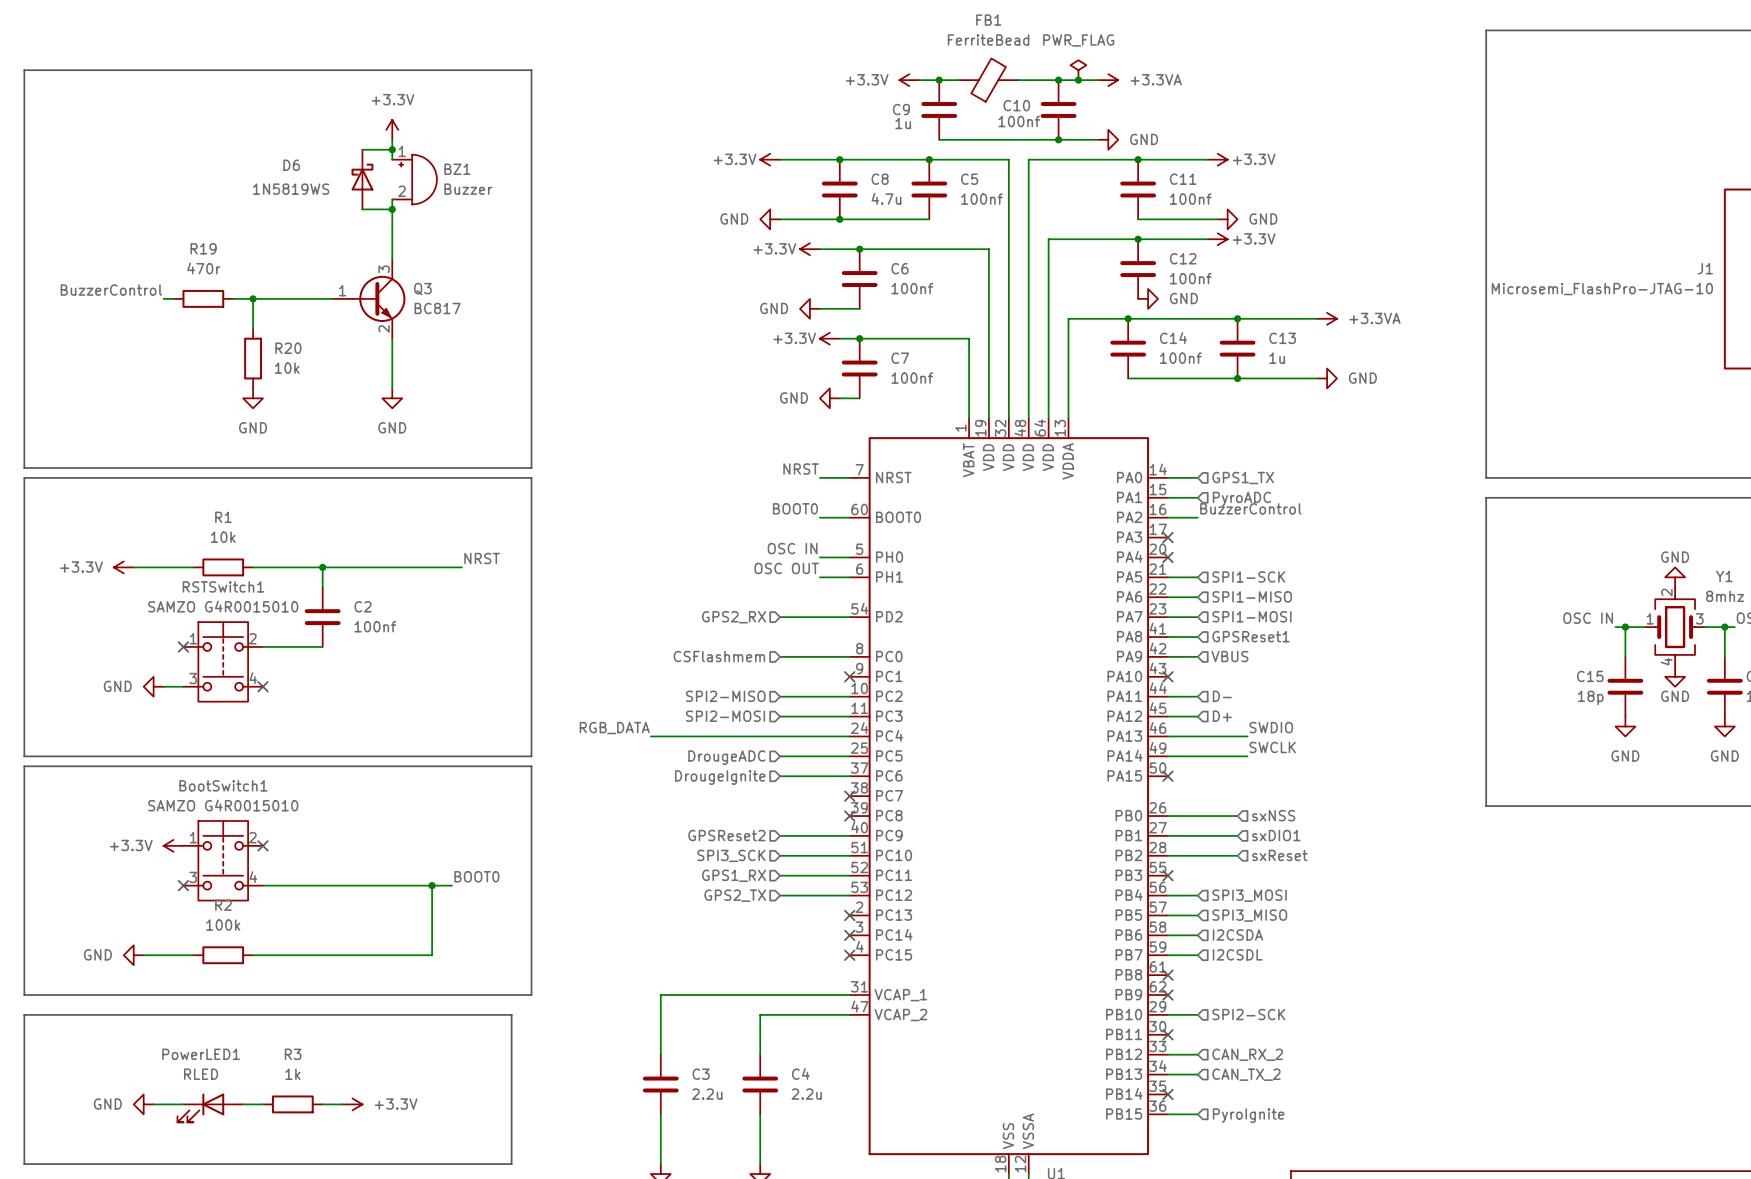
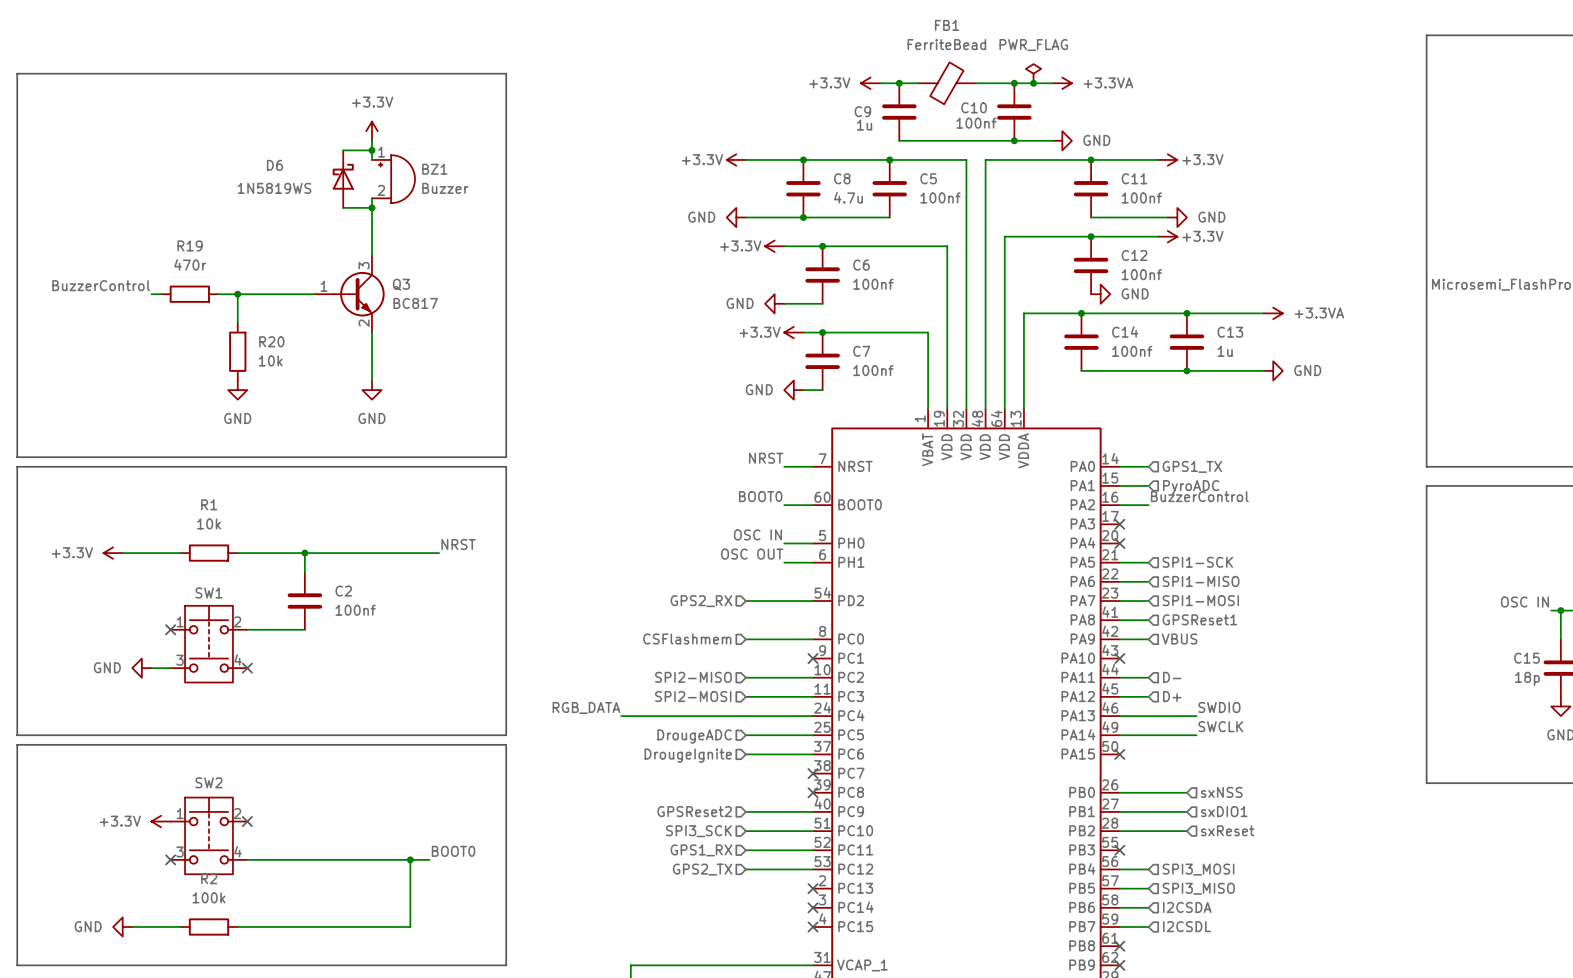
RSTSwitch1 name: RSTSwitch1 (223, 586) -> SW1 (208, 592)
RSTSwitch1 value: SAMZO G4R0015010 (223, 606) -> none
BootSwitch1 name: BootSwitch1 (223, 785) -> SW2 (208, 782)
BootSwitch1 value: SAMZO G4R0015010 (223, 805) -> none

